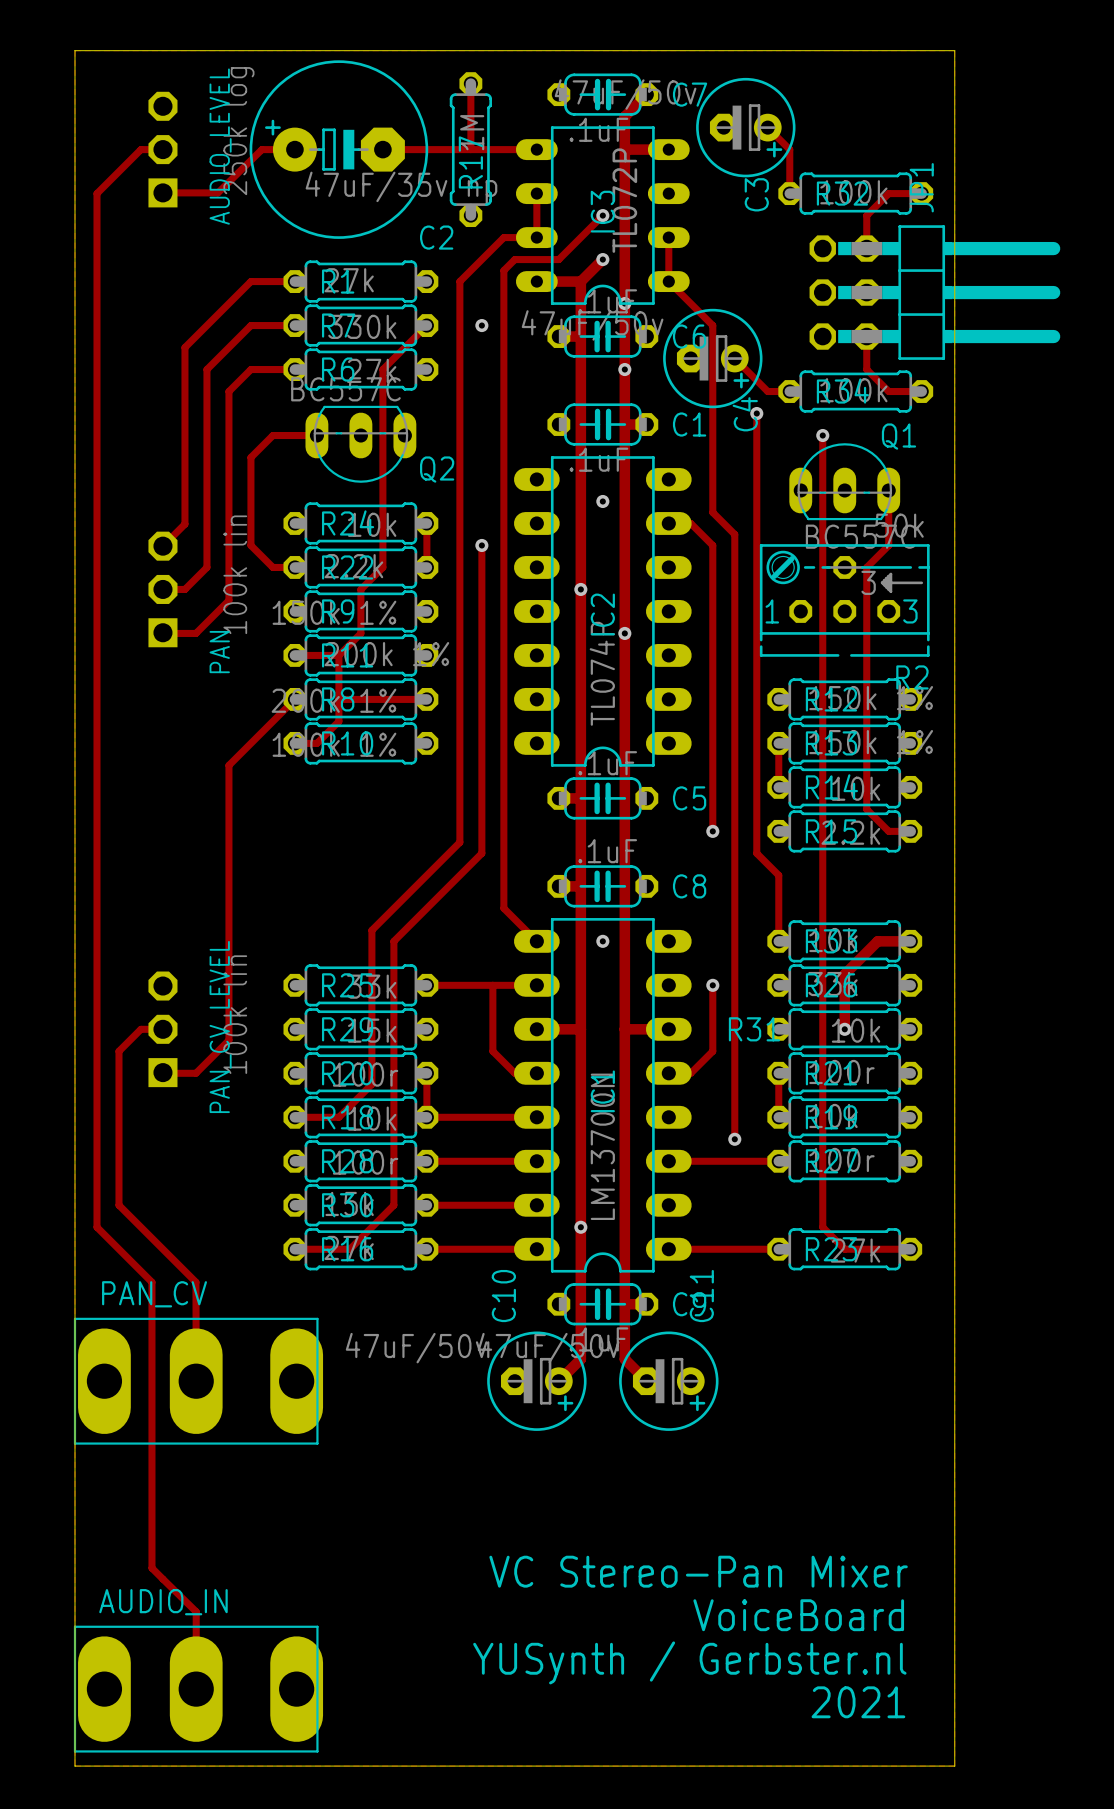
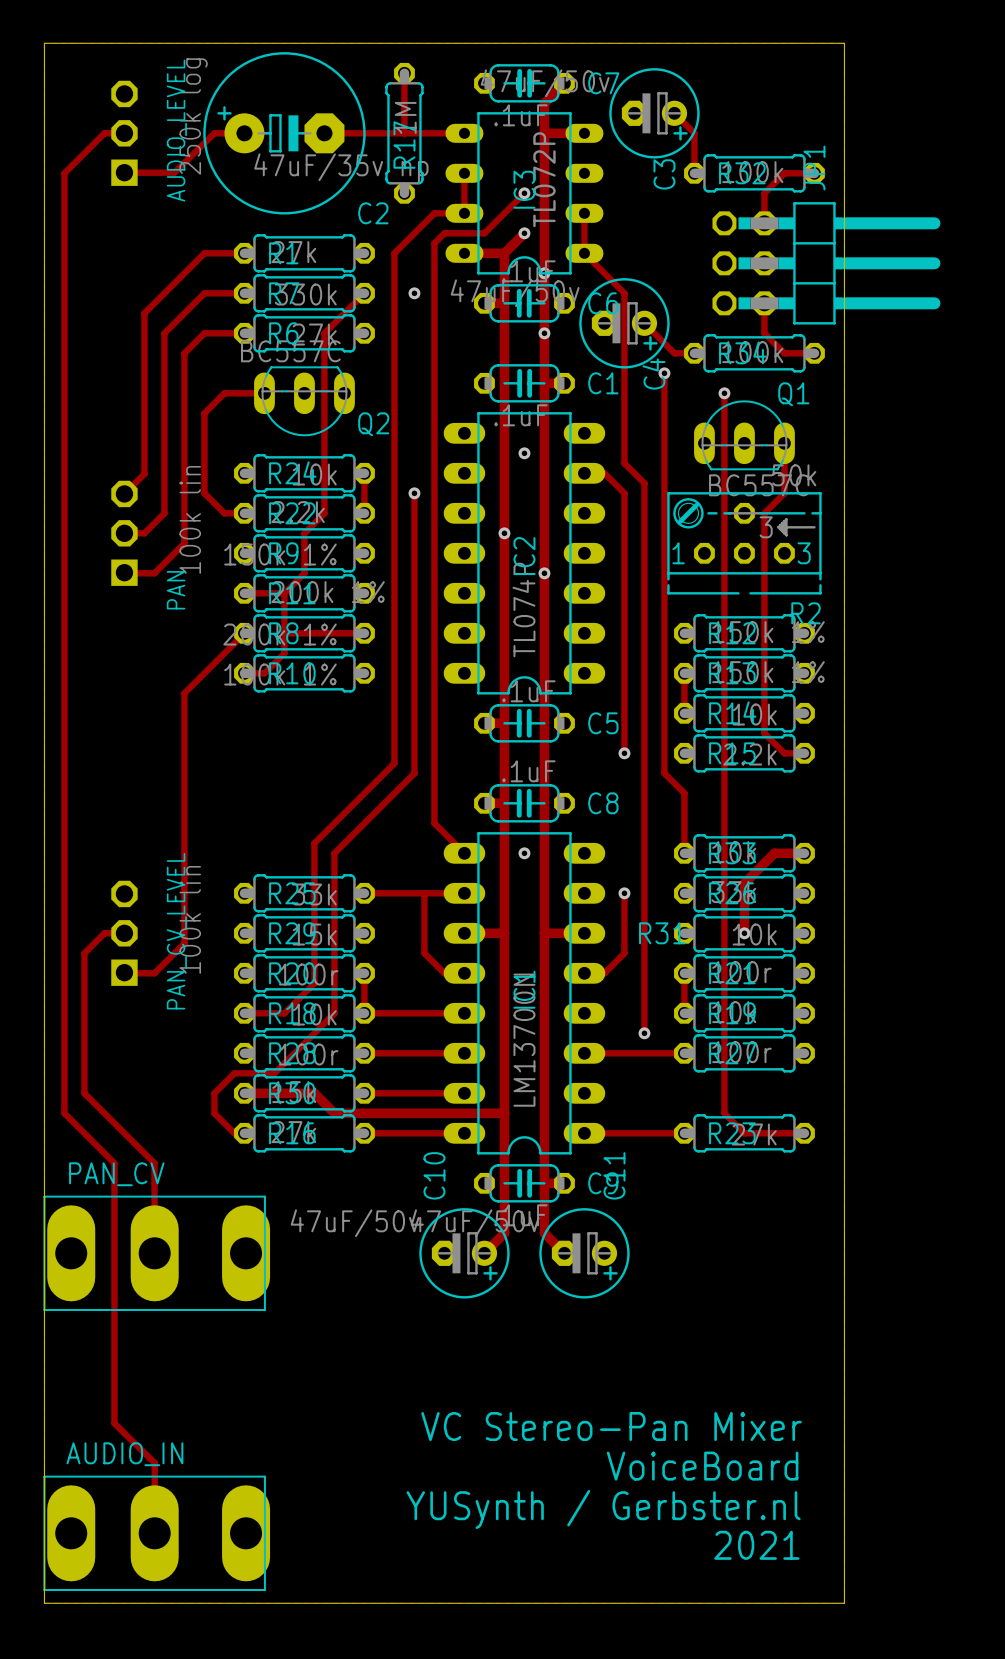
track: (393, 1117) (393, 1205) (349, 1249) (294, 1249) -> (334, 1013) (274, 1073) (234, 1073) (214, 1093) (214, 1113) (234, 1133) (244, 1133)
track: none -> (244, 1093) (314, 1093) (334, 1113) (504, 1113)
via: (580, 1227) -> none

